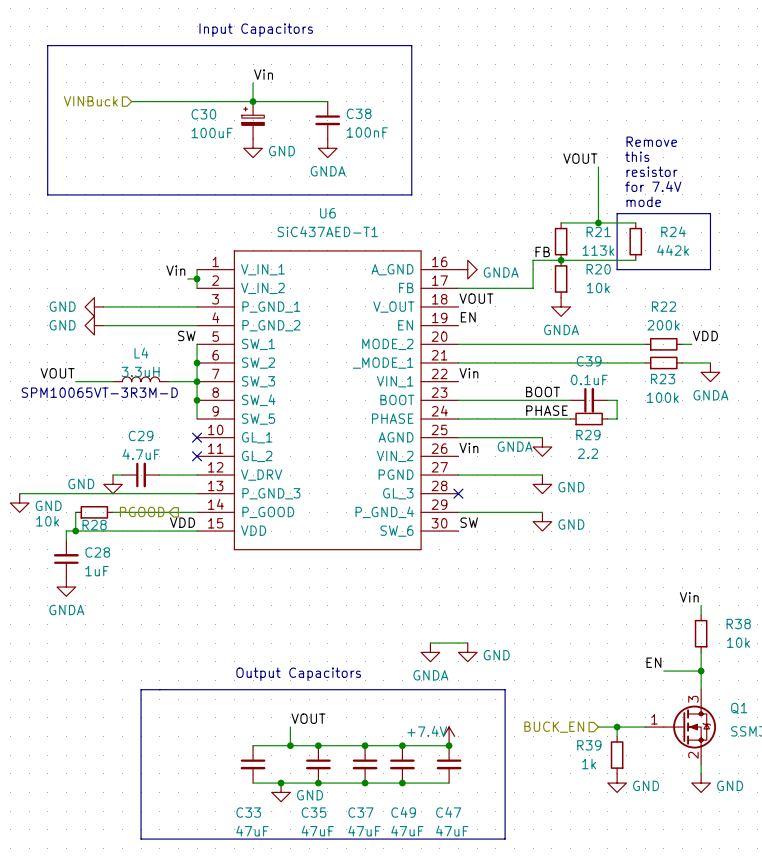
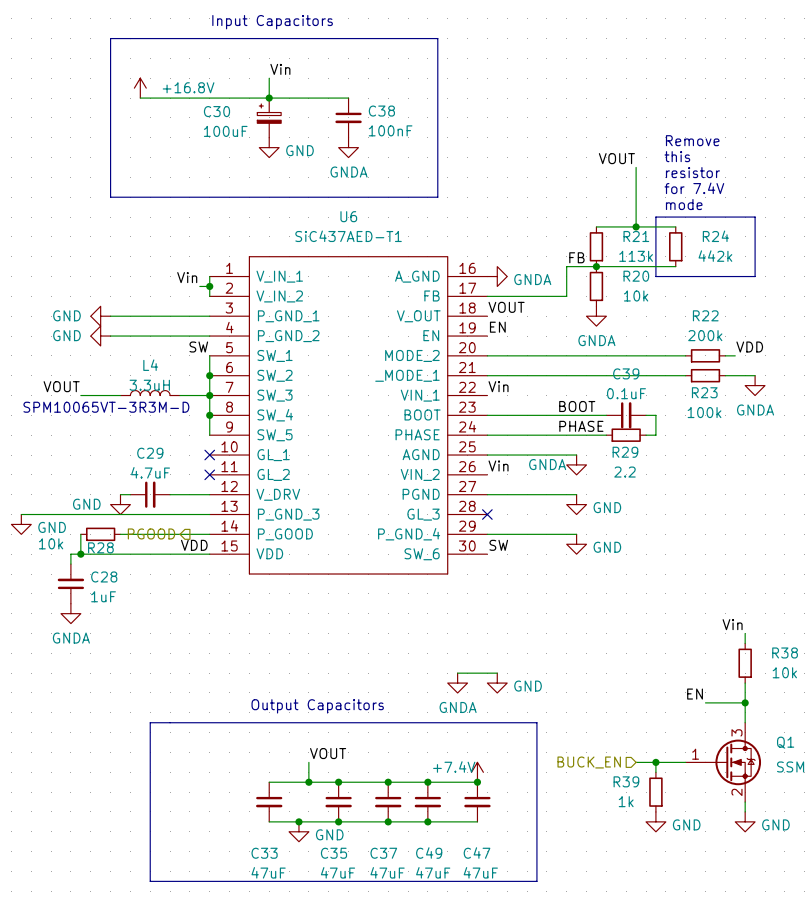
line: (103, 45) (47, 45) (47, 194) (103, 194) -> (110, 38) (110, 197)
power symbol: none -> +16.8V (140, 88)
hierarchical label: VINBuck (90, 101) -> none

